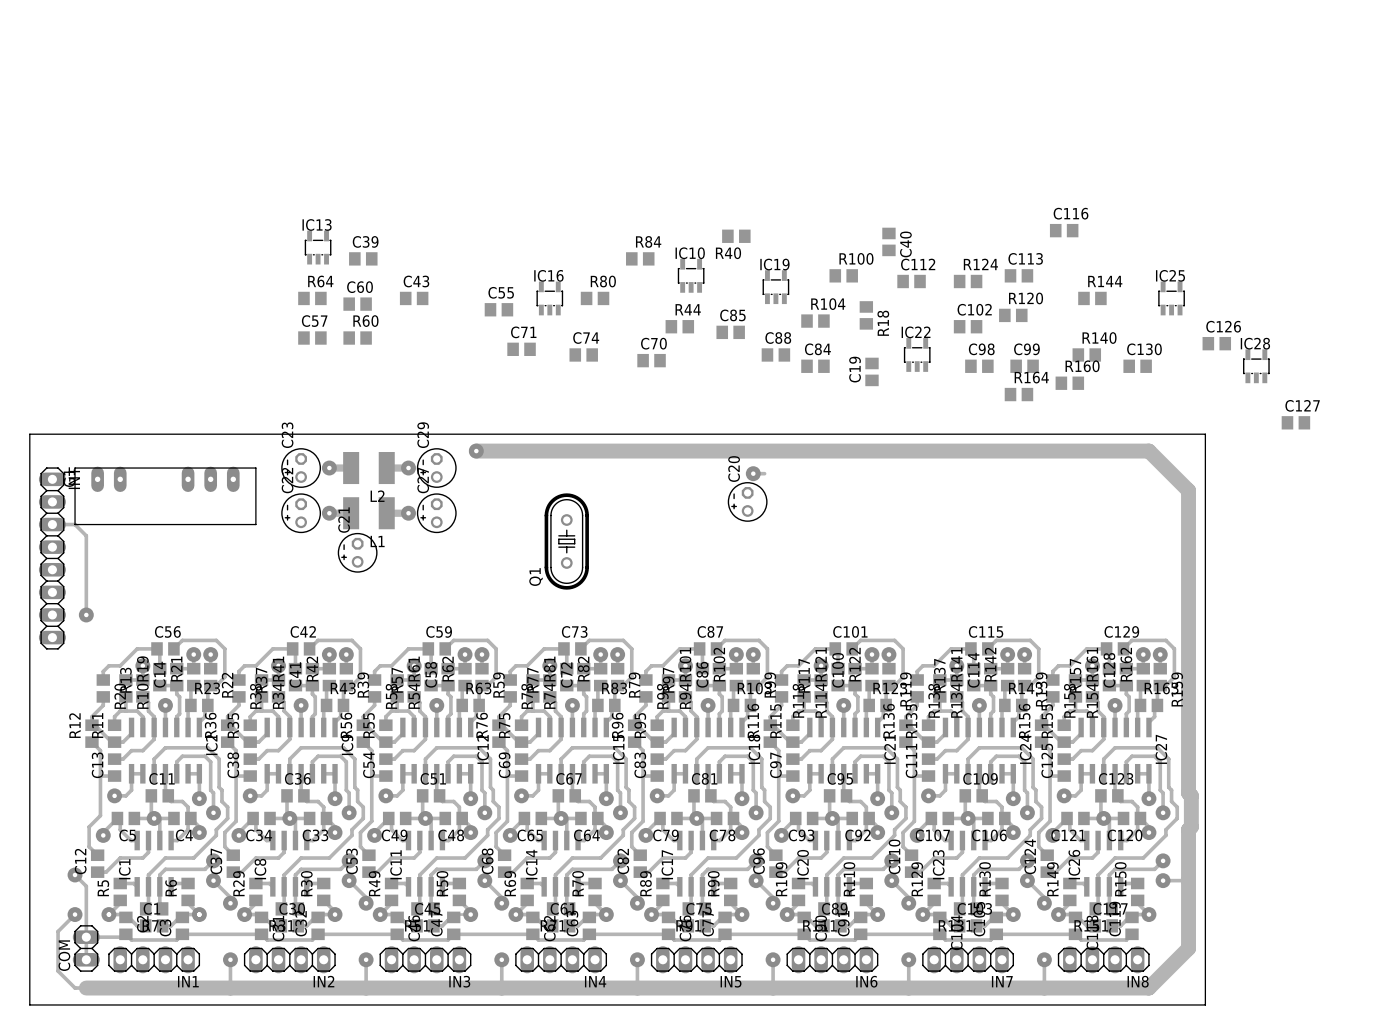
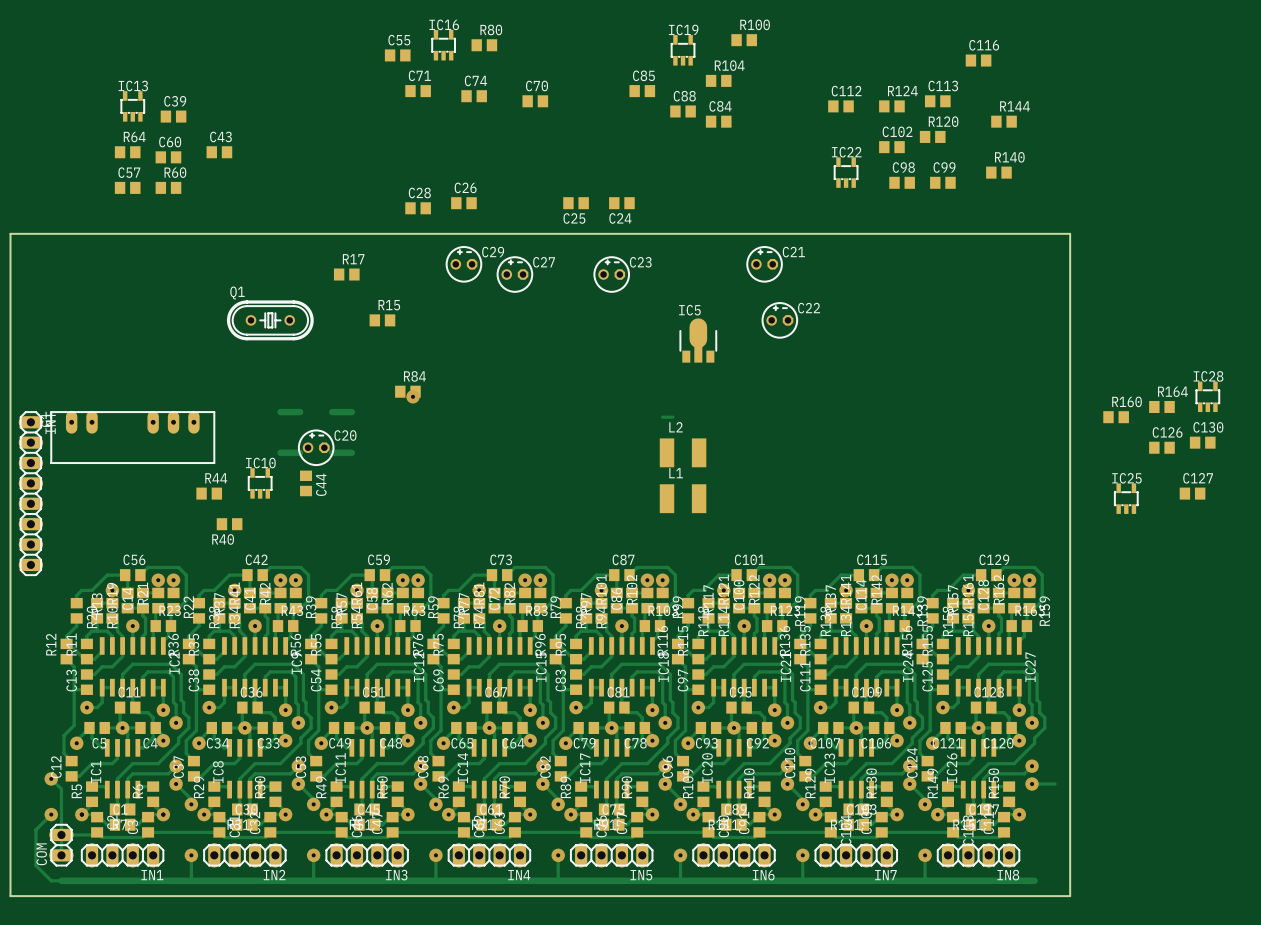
C116 position: (1064, 230) -> (978, 60)
C26: none -> (463, 203)
C25: none -> (576, 203)
C24: none -> (621, 203)
R40 position: (736, 236) -> (229, 524)
C28: none -> (418, 208)
C40: (888, 241) -> none
IC13 position: (318, 247) -> (132, 106)
C39 position: (363, 258) -> (173, 116)
R84 position: (640, 258) -> (407, 391)
IC10 position: (691, 275) -> (260, 483)
R100 position: (843, 275) -> (744, 40)
C113 position: (1018, 275) -> (937, 101)
C112 position: (911, 281) -> (840, 106)
R124 position: (968, 281) -> (891, 106)
IC19 position: (775, 287) -> (683, 50)
R64 position: (312, 298) -> (127, 152)
C43 position: (414, 298) -> (219, 152)
IC16 position: (549, 298) -> (443, 45)
R80 position: (595, 298) -> (484, 45)
R144 position: (1092, 298) -> (1004, 121)
IC25 position: (1171, 298) -> (1126, 498)
C60 position: (357, 304) -> (168, 157)
C55 position: (498, 309) -> (397, 55)
R17: none -> (346, 274)
R18: (866, 315) -> none
R120 position: (1013, 315) -> (932, 136)
R104 position: (815, 321) -> (718, 80)
R44 position: (679, 326) -> (209, 493)
C102 position: (968, 326) -> (891, 147)
C85 position: (730, 332) -> (642, 91)
C57 position: (312, 338) -> (127, 187)
R60 position: (357, 338) -> (168, 187)
C126 position: (1216, 343) -> (1161, 447)
C71 position: (521, 349) -> (418, 91)
C74 position: (583, 354) -> (474, 96)
C88 position: (775, 354) -> (683, 111)
IC22 position: (917, 354) -> (846, 172)
R140 position: (1086, 354) -> (998, 172)
C70 position: (651, 360) -> (535, 101)
R15: none -> (382, 320)
C84 position: (815, 366) -> (718, 121)
C98 position: (979, 366) -> (902, 182)
C99 position: (1024, 366) -> (942, 182)
C130 position: (1137, 366) -> (1202, 442)
IC28 position: (1256, 366) -> (1207, 396)
C19: (872, 371) -> none
R160 position: (1069, 383) -> (1116, 417)
IC5: none -> (698, 340)
R164 position: (1018, 394) -> (1161, 406)
C127 position: (1295, 422) -> (1192, 493)
board edge: (29, 434) (1205, 434) -> (10, 381) (10, 233) (1070, 233) (1070, 381)
track: (476, 451) (1148, 451) (1188, 490) (1188, 793) (1191, 795) (1191, 826) (1188, 829) (1188, 948) (1148, 988) -> (1034, 880) (1019, 880)
C23 rotation: 0° (301, 468) -> 90° clockwise (611, 274)
C23 position: (301, 468) -> (611, 274)
via: (329, 468) -> none
L2 position: (368, 468) -> (683, 452)
via: (408, 468) -> none
C29 rotation: 0° (436, 468) -> 90° clockwise (463, 264)
C29 position: (436, 468) -> (463, 264)
via: (753, 473) -> none
L2 name position: L2 (377, 496) -> L2 (676, 427)
C20 rotation: 0° (747, 501) -> 90° clockwise (316, 447)
C20 position: (747, 501) -> (316, 447)
C22 rotation: 0° (301, 513) -> 90° clockwise (779, 320)
C22 position: (301, 513) -> (779, 320)
via: (329, 513) -> none
L1 position: (368, 513) -> (683, 498)
via: (408, 513) -> none
C27 rotation: 0° (436, 513) -> 90° clockwise (514, 274)
C27 position: (436, 513) -> (514, 274)
track: (52, 524) (75, 524) (86, 535) (86, 614) -> none
L1 name position: L1 (377, 541) -> L1 (676, 473)
Q1 rotation: 0° (566, 541) -> 90° clockwise (270, 320)
Q1 position: (566, 541) -> (270, 320)
C44: none -> (306, 483)
C21 rotation: 0° (357, 552) -> 90° clockwise (764, 264)
C21 position: (357, 552) -> (764, 264)
via: (86, 614) -> none
track width: thick (86, 988) (1148, 988) -> thin (61, 880) (1019, 880)

